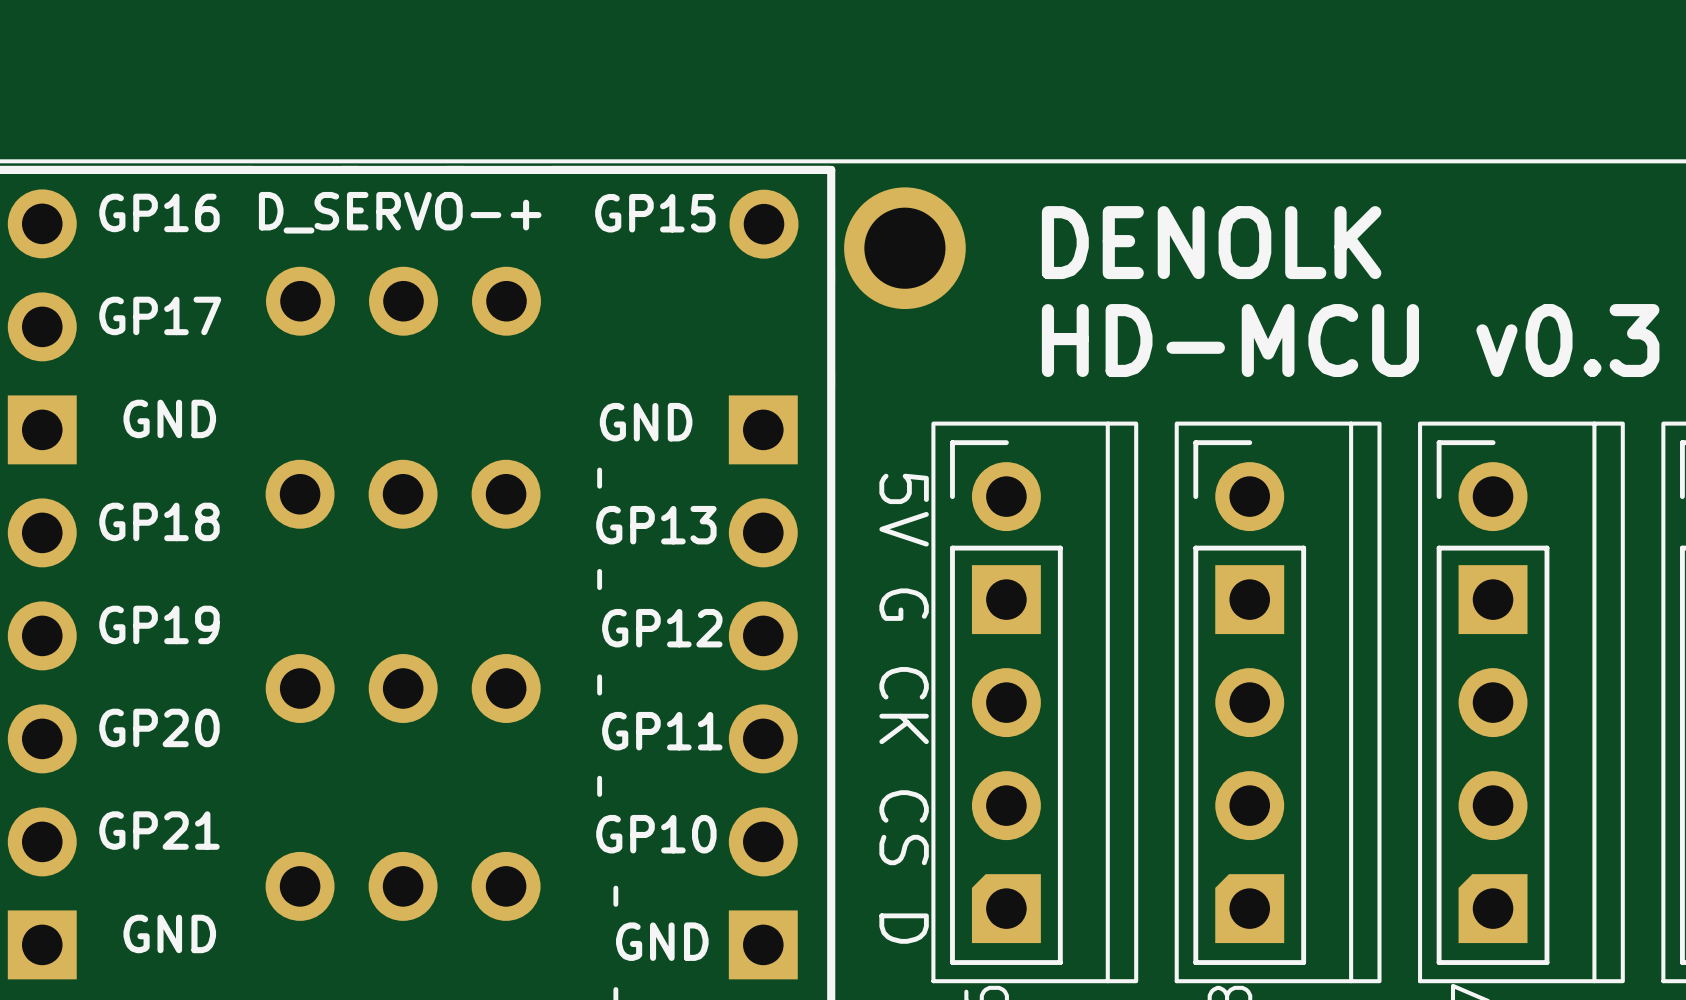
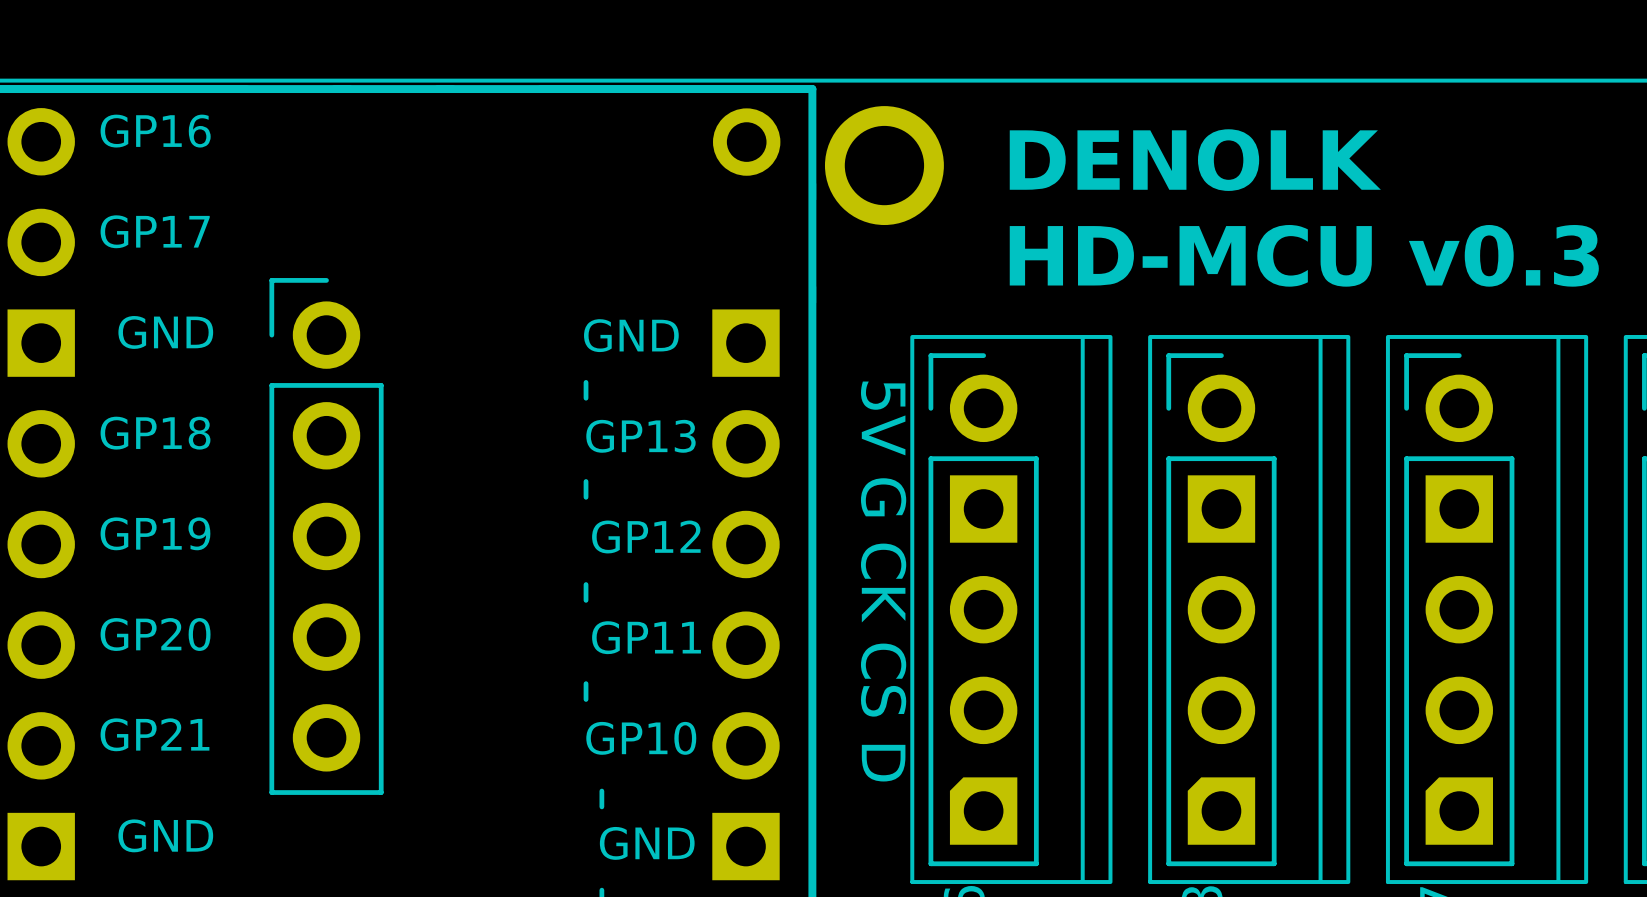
text: D_SERVO-+ (400, 212) -> none
text: GP15 (655, 213) -> none
part: (403, 301) -> none
part: (403, 494) -> none
part: none -> (326, 536)
part: (403, 688) -> none
part: (403, 886) -> none

